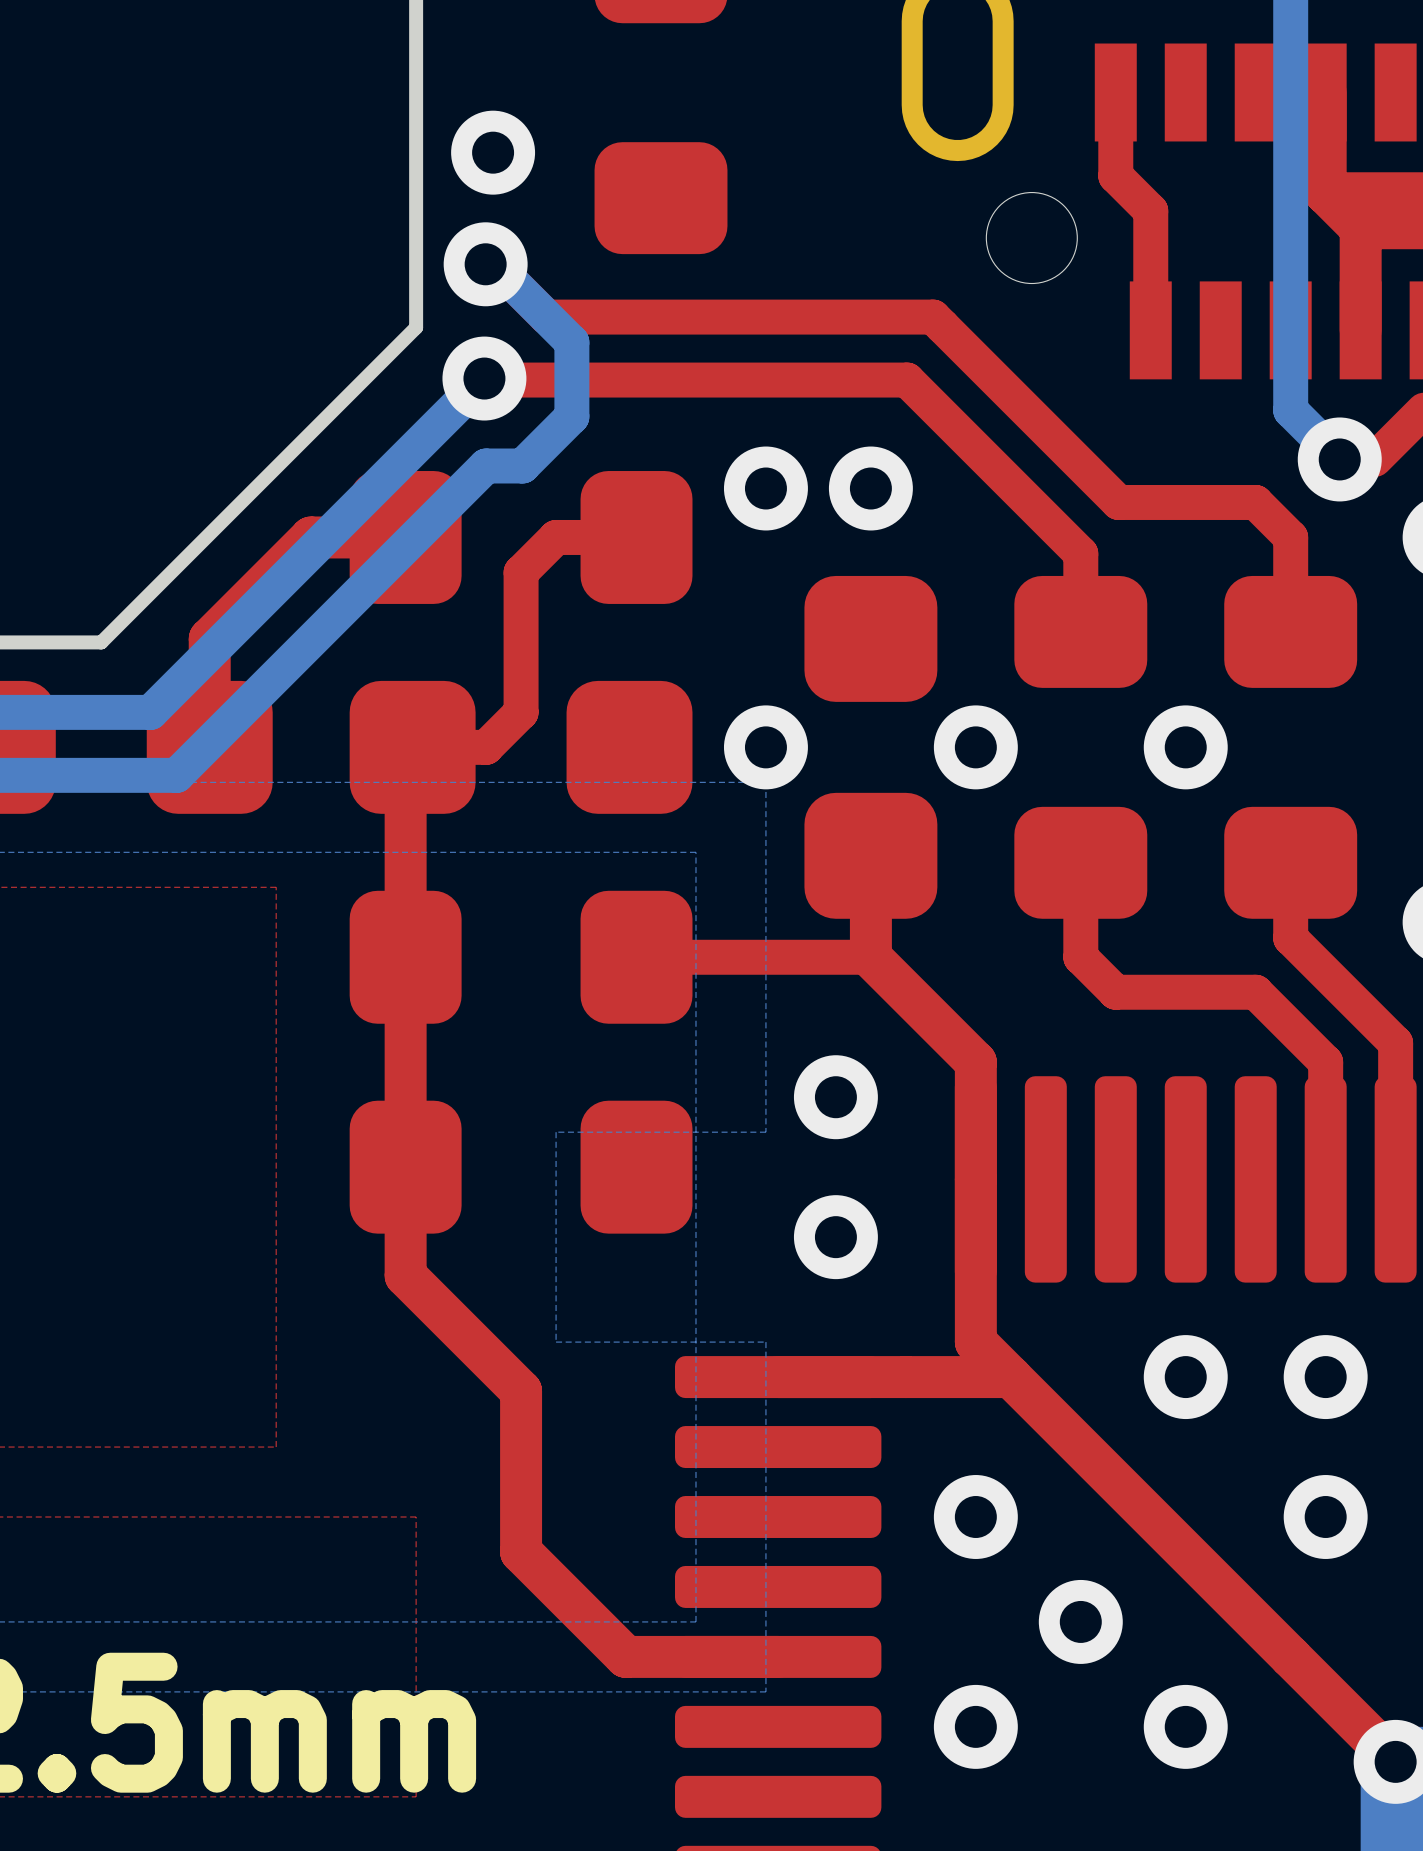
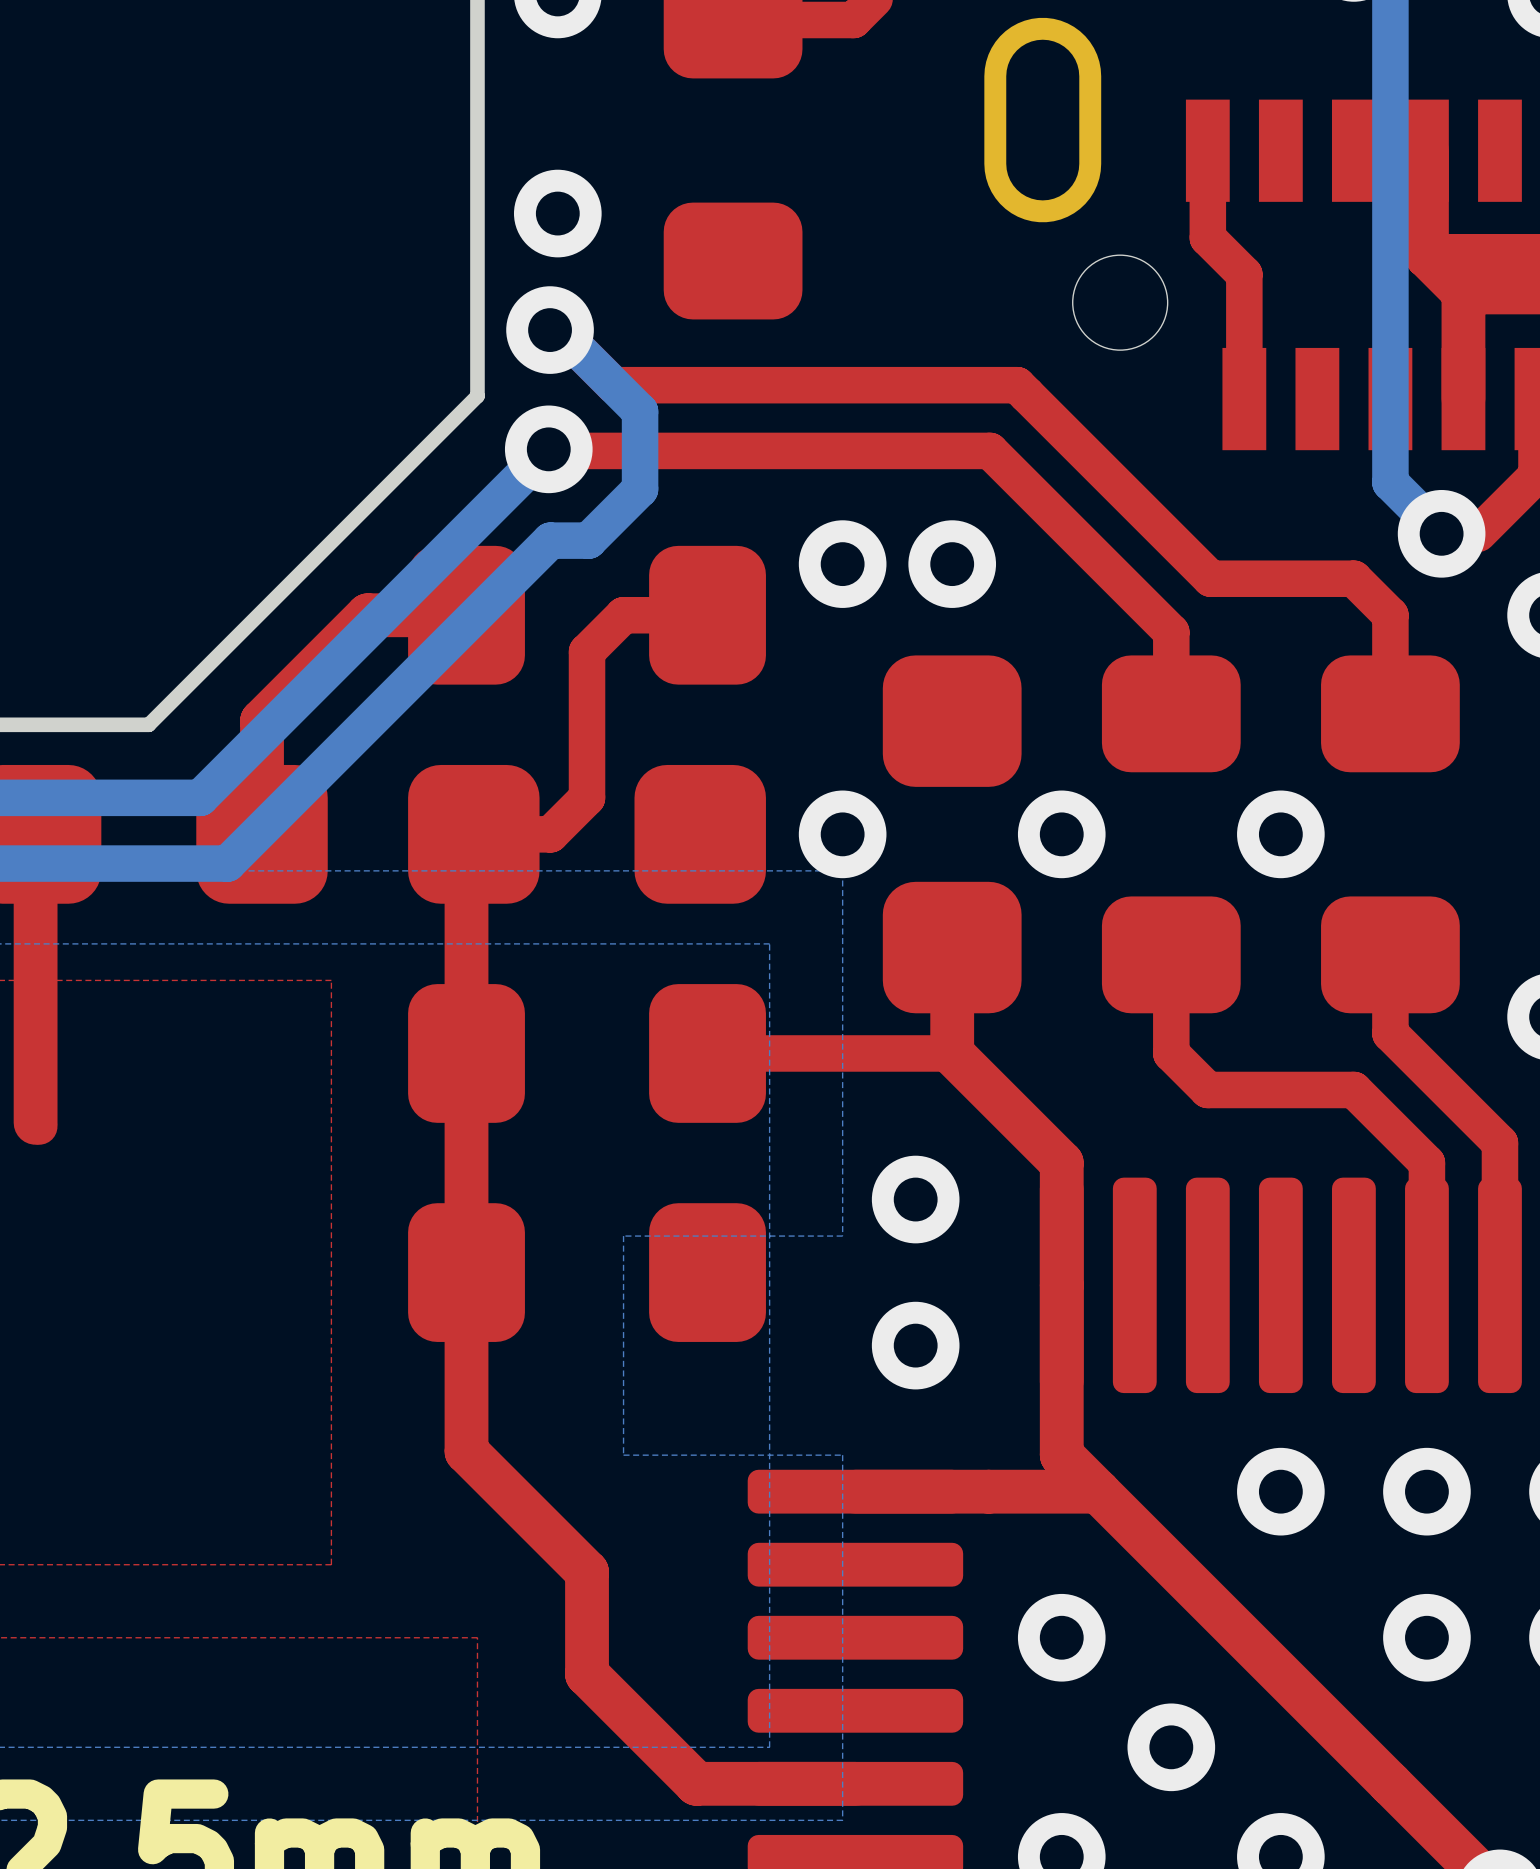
top track: (405, 1275) (521, 1391) (521, 1454) -> (466, 1385) (466, 1451) (587, 1572)

